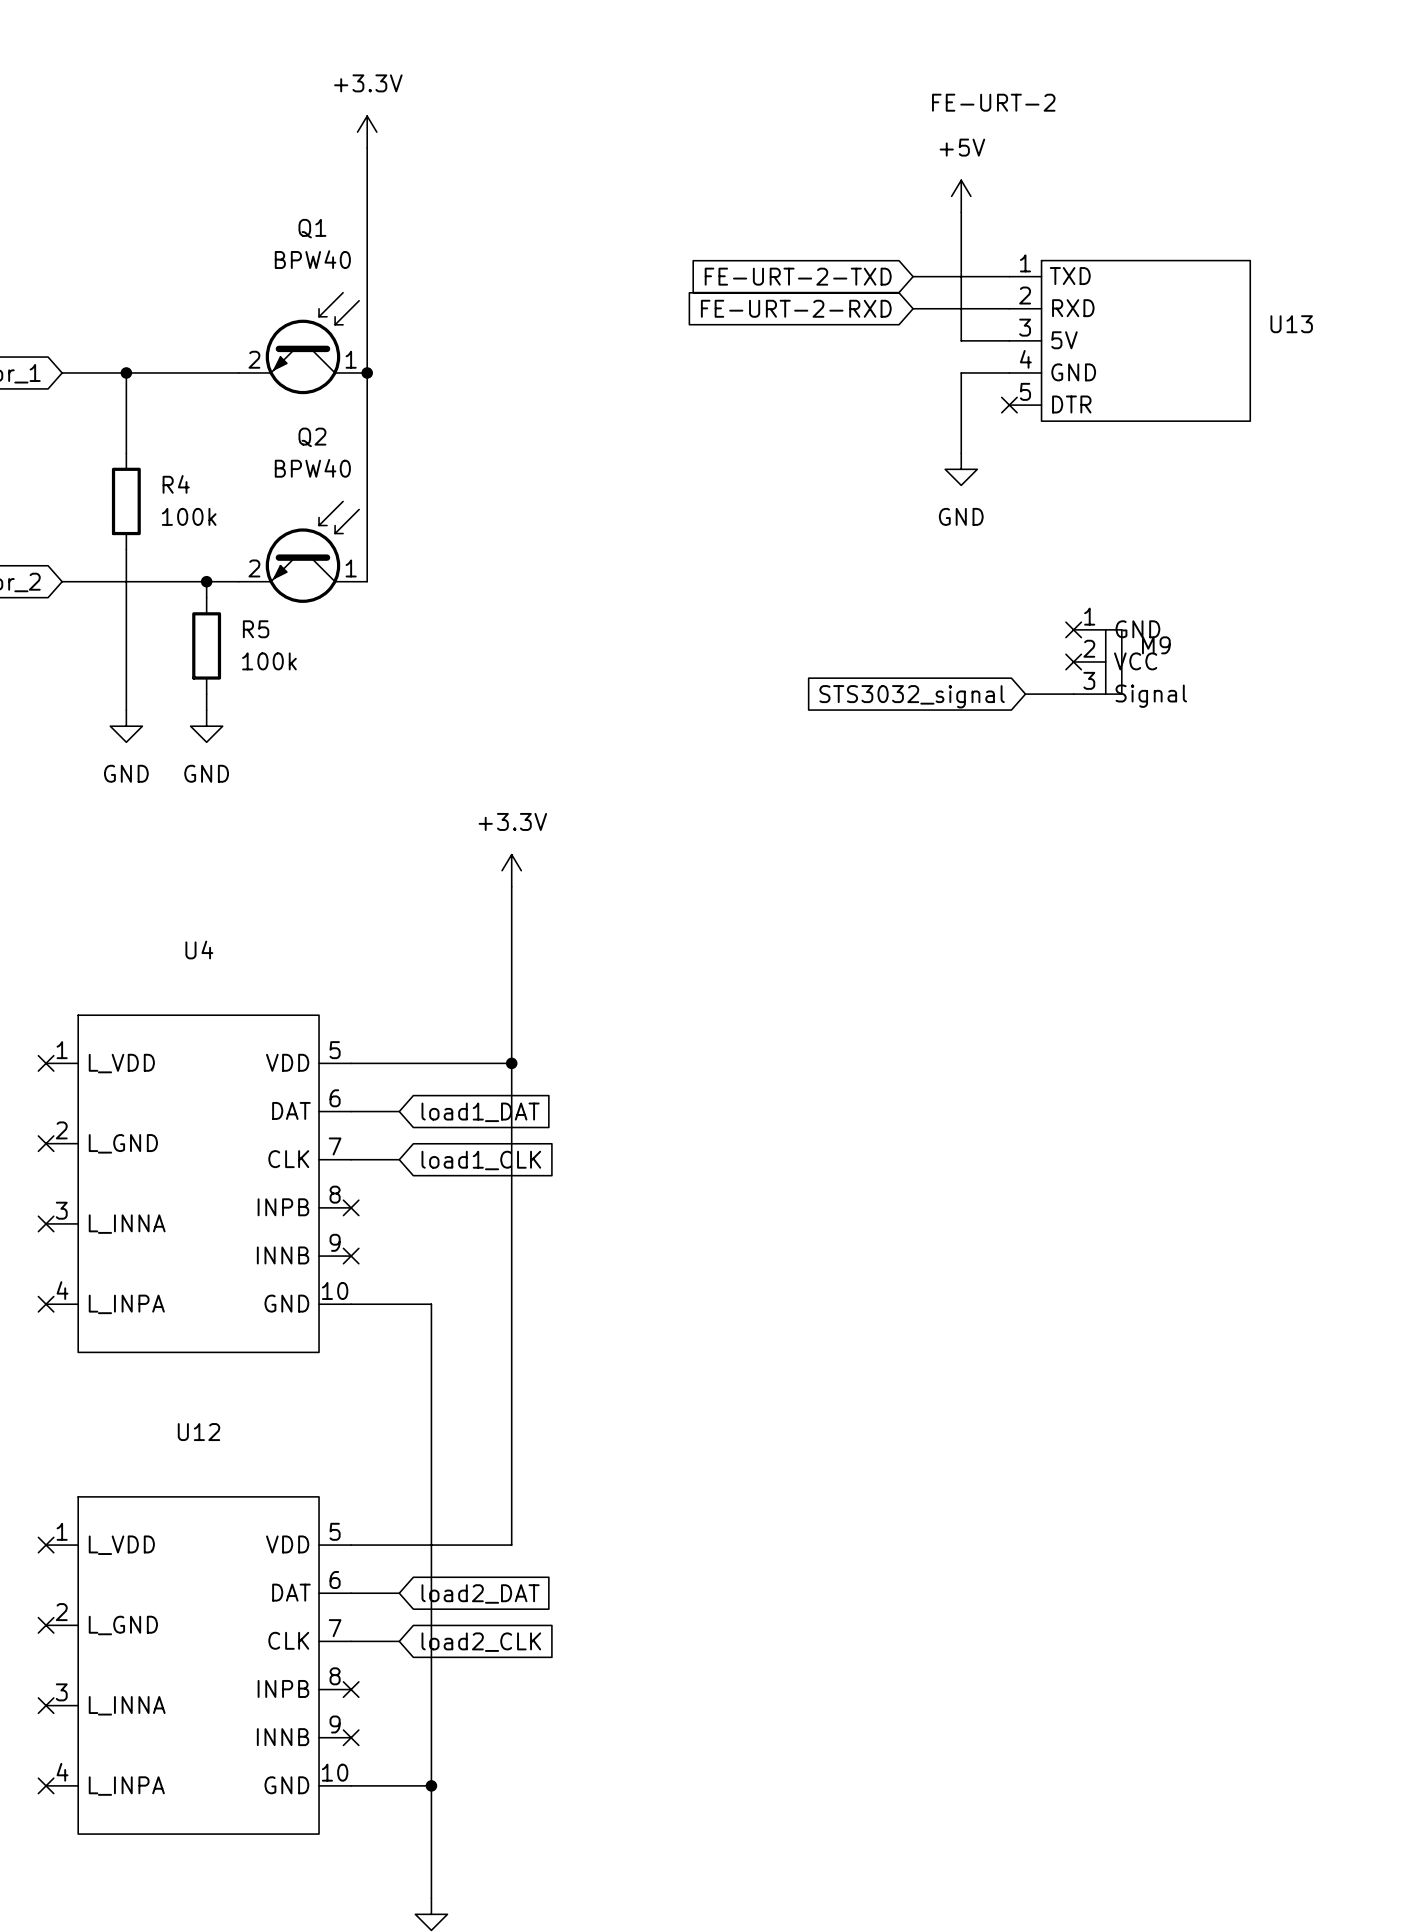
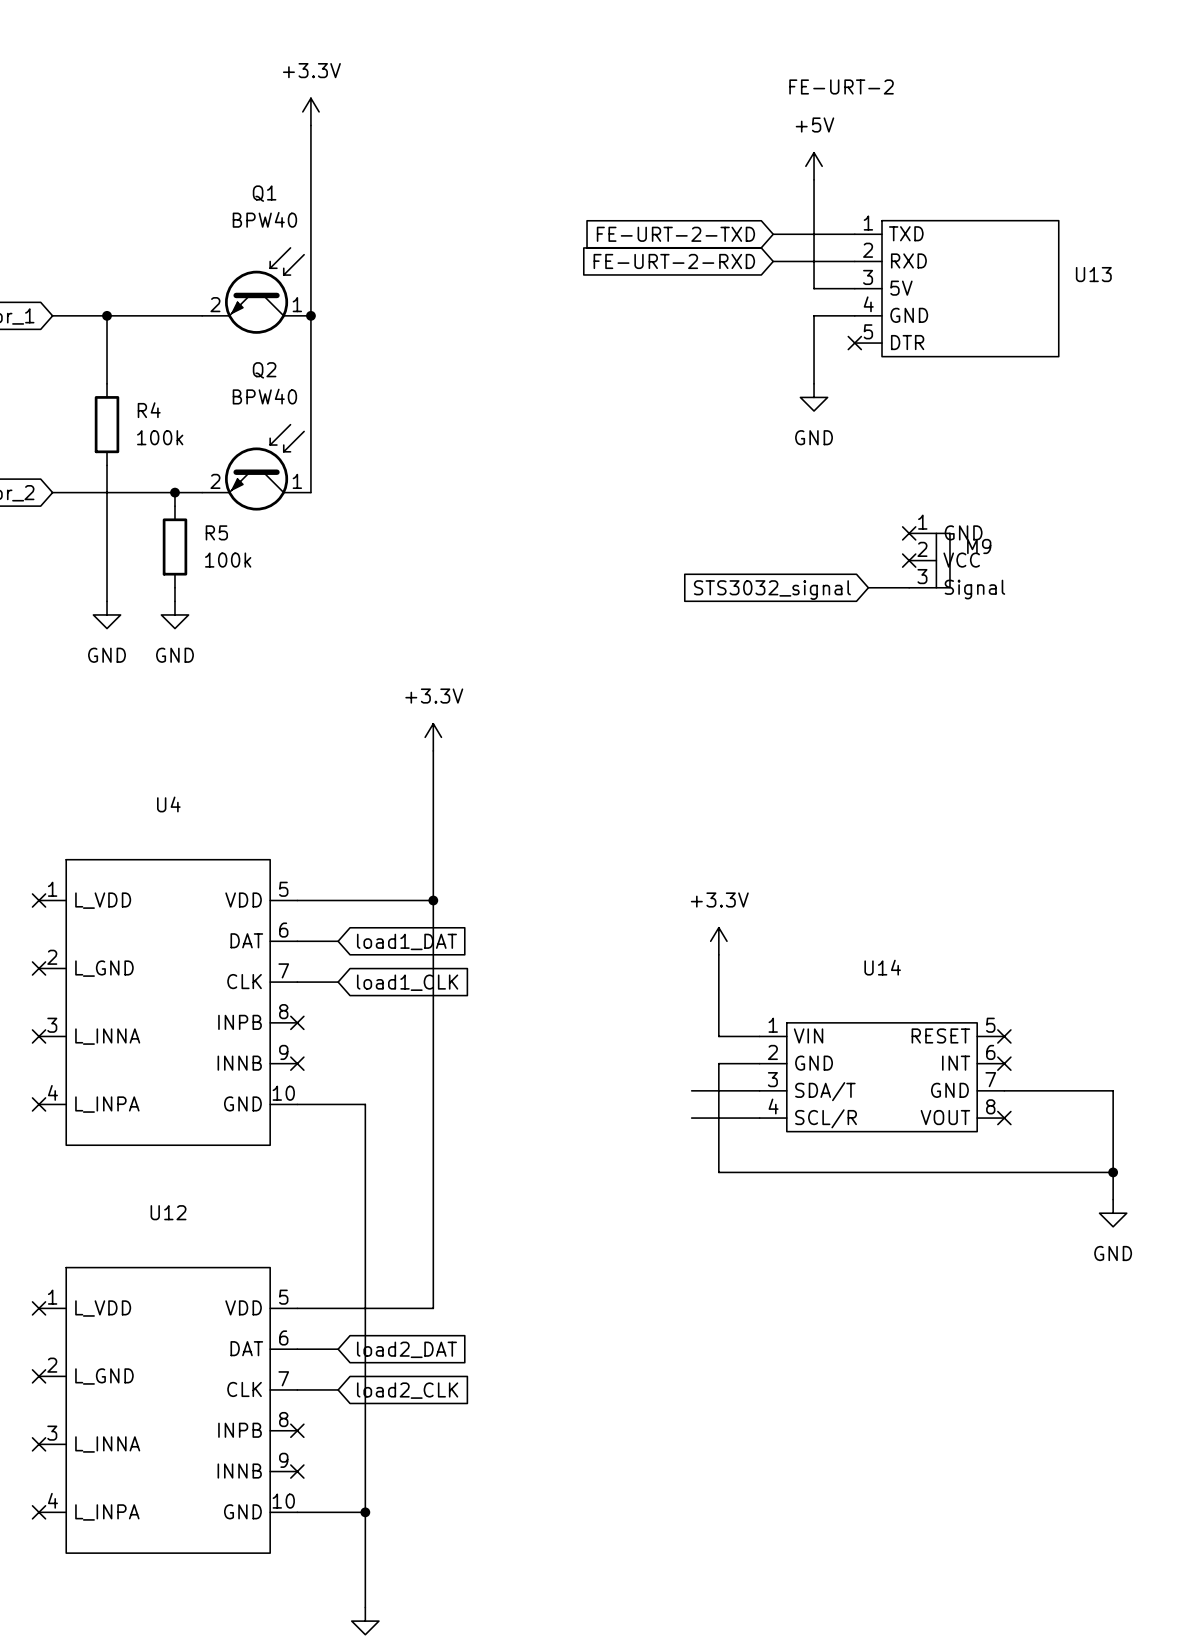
power symbol: none -> +3.3V (718, 941)
wire: none -> (718, 954) (718, 1036) (759, 1036)
no-connect mark: none -> (1004, 1036)
wire: none -> (759, 1063) (718, 1063) (718, 1172) (1113, 1172)
no-connect mark: none -> (1004, 1063)
U14: none -> (882, 1077)
wire: none -> (691, 1090) (759, 1090)
wire: none -> (1004, 1090) (1113, 1090) (1113, 1199)
wire: none -> (691, 1118) (759, 1118)
no-connect mark: none -> (1004, 1118)
junction: none -> (1113, 1172)
power symbol: none -> GND (1113, 1213)

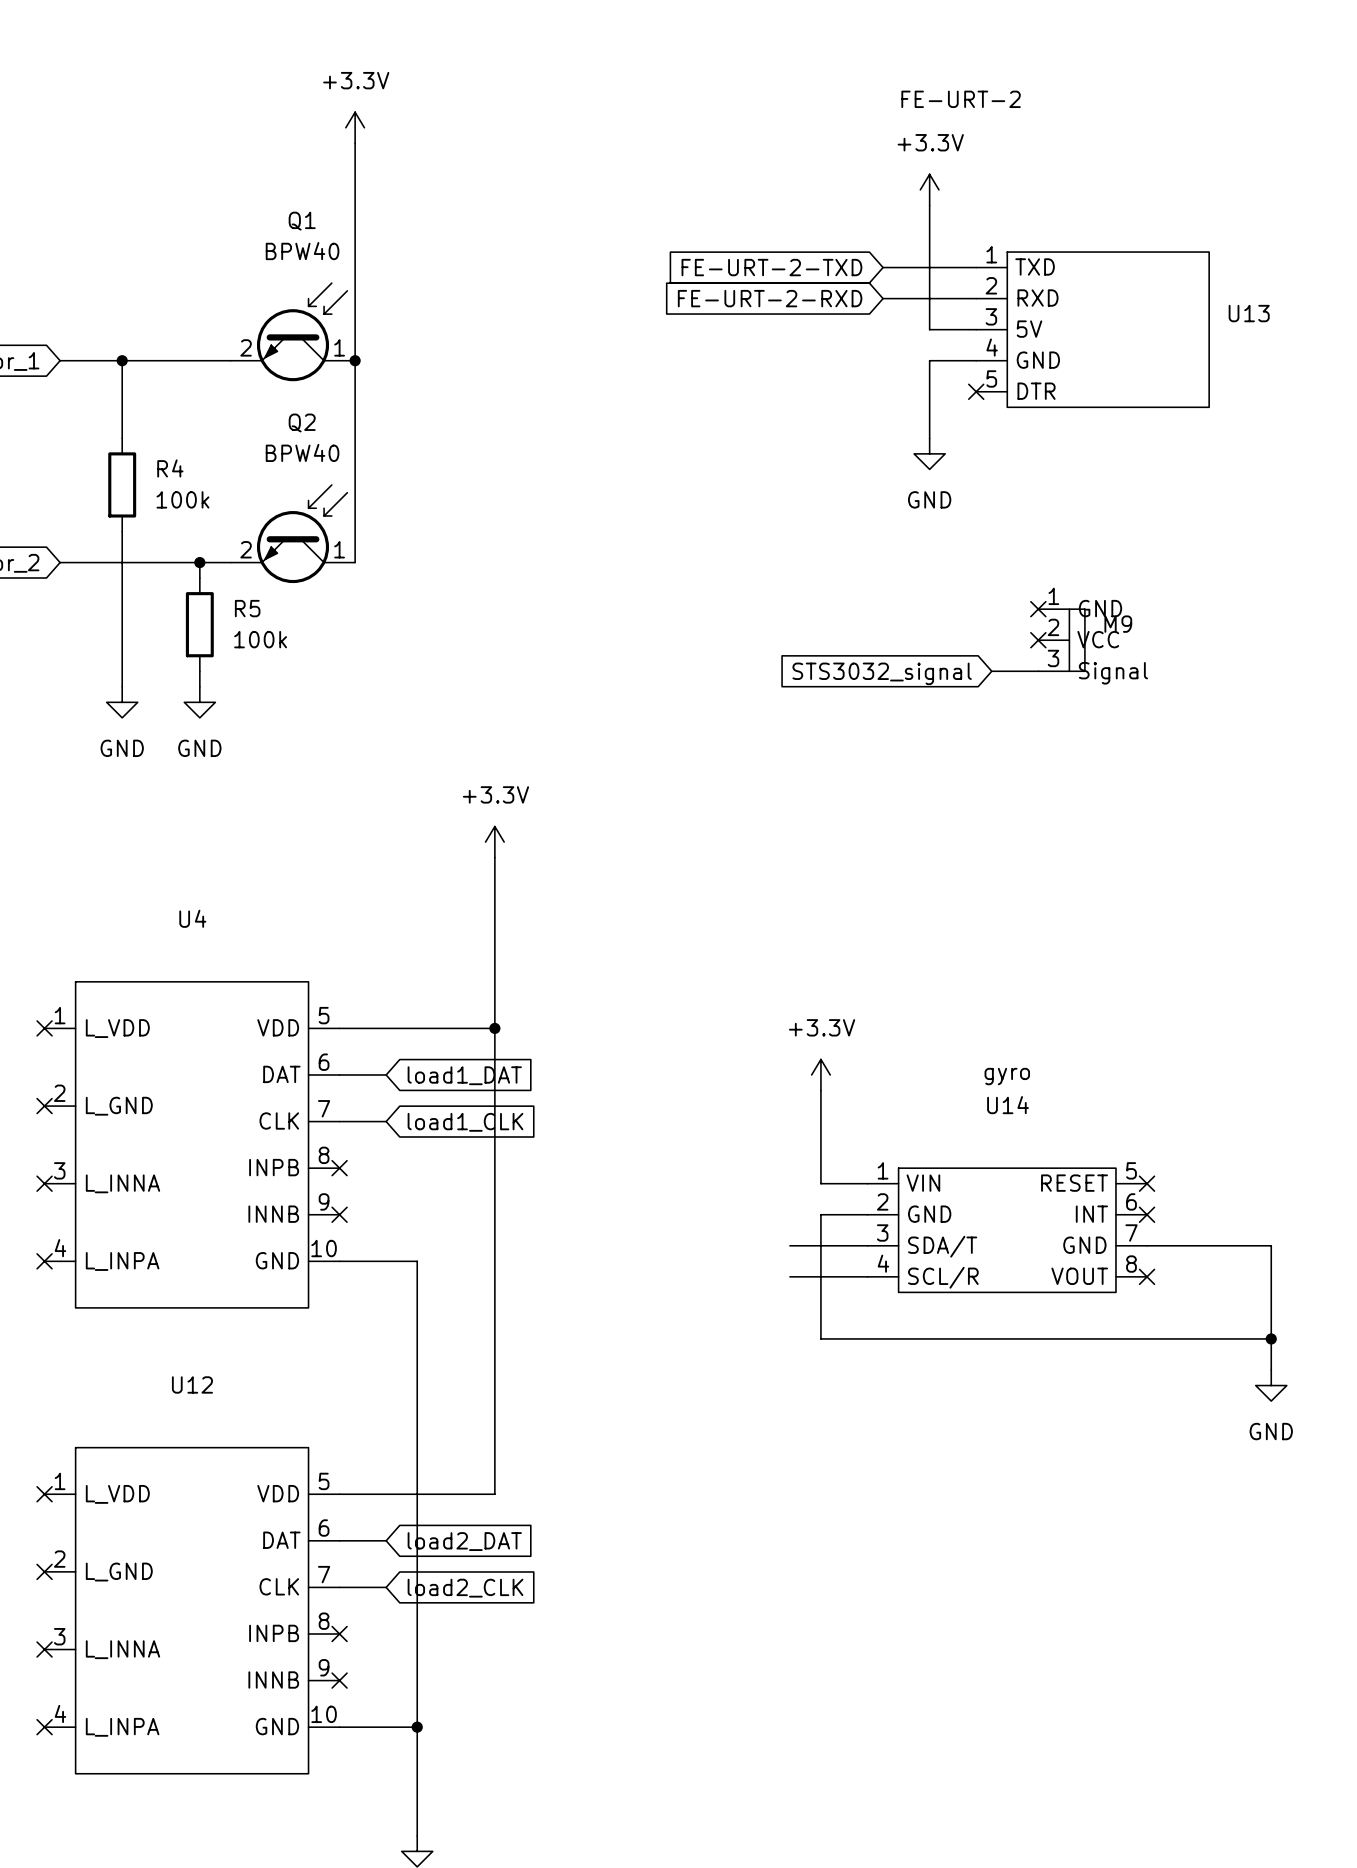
power symbol: +5V (814, 166) -> +3.3V (929, 189)
text: none -> gyro (1007, 1076)

